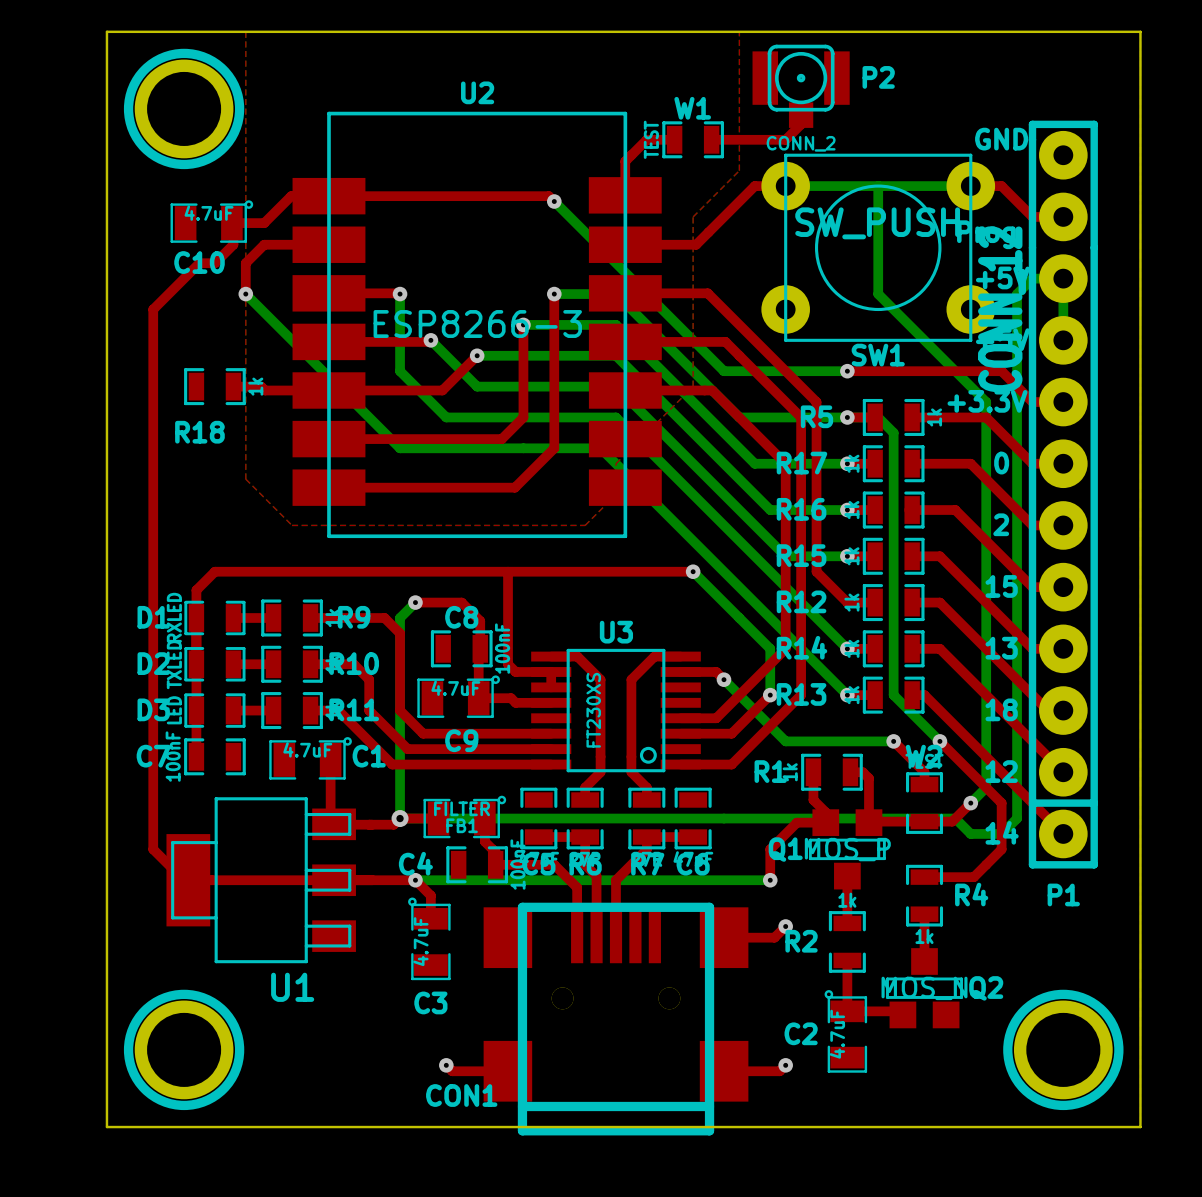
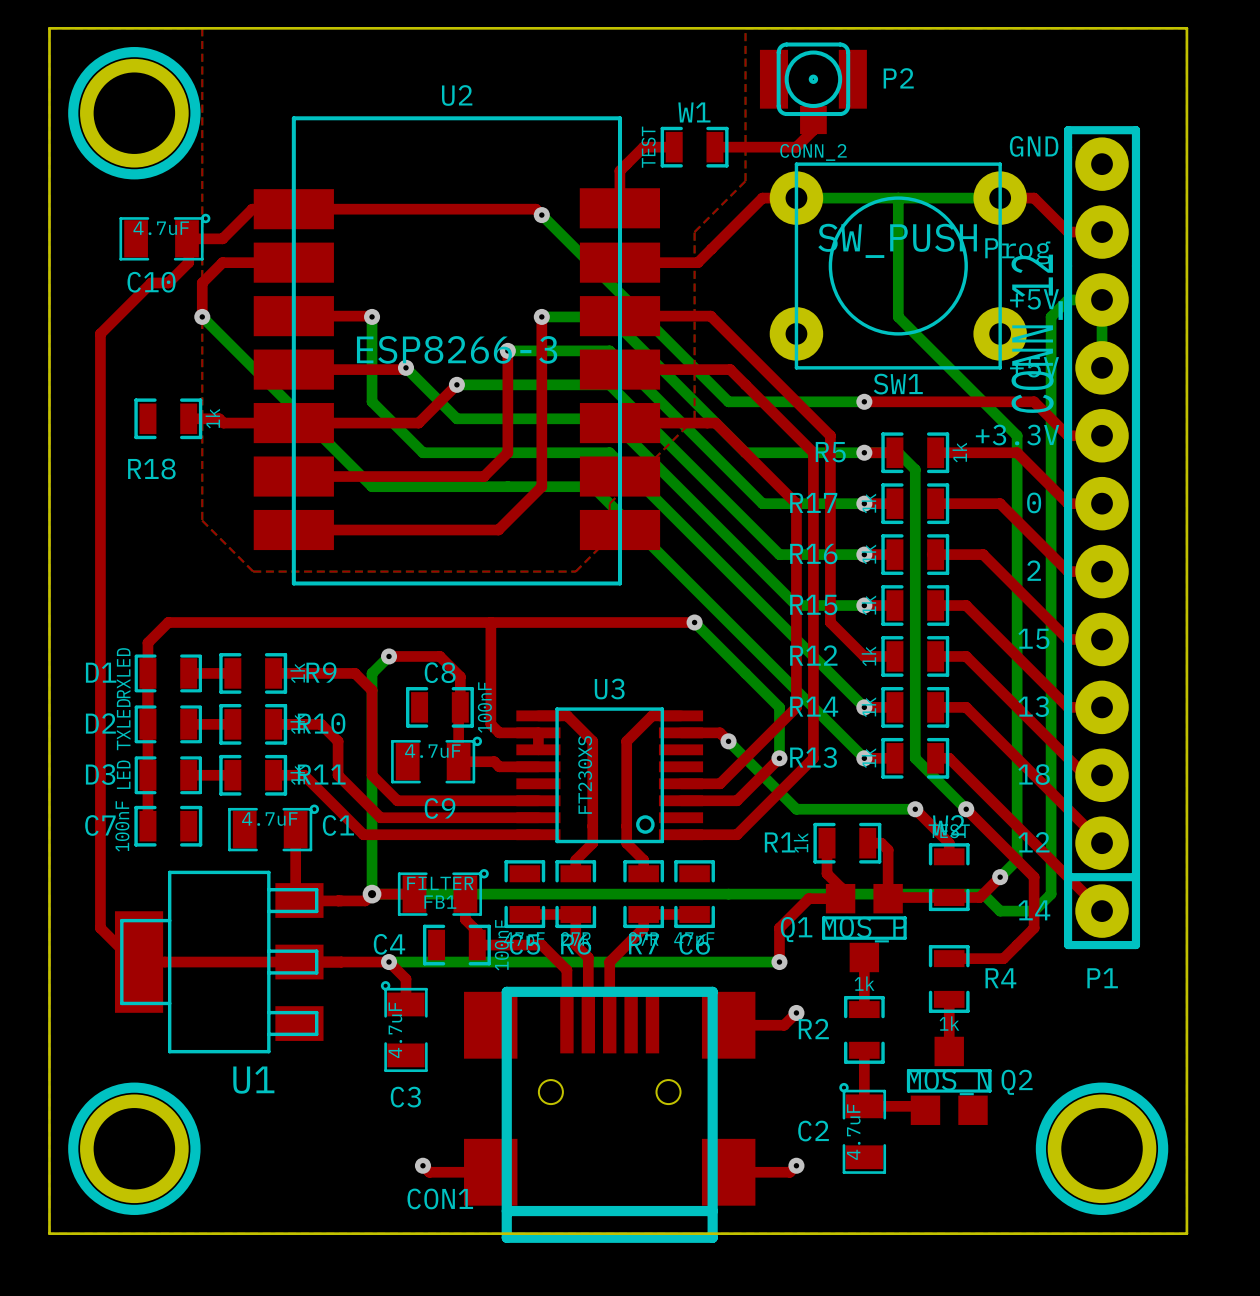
CON1 footprint: [483, 902, 749, 1136] -> [464, 986, 756, 1243]

